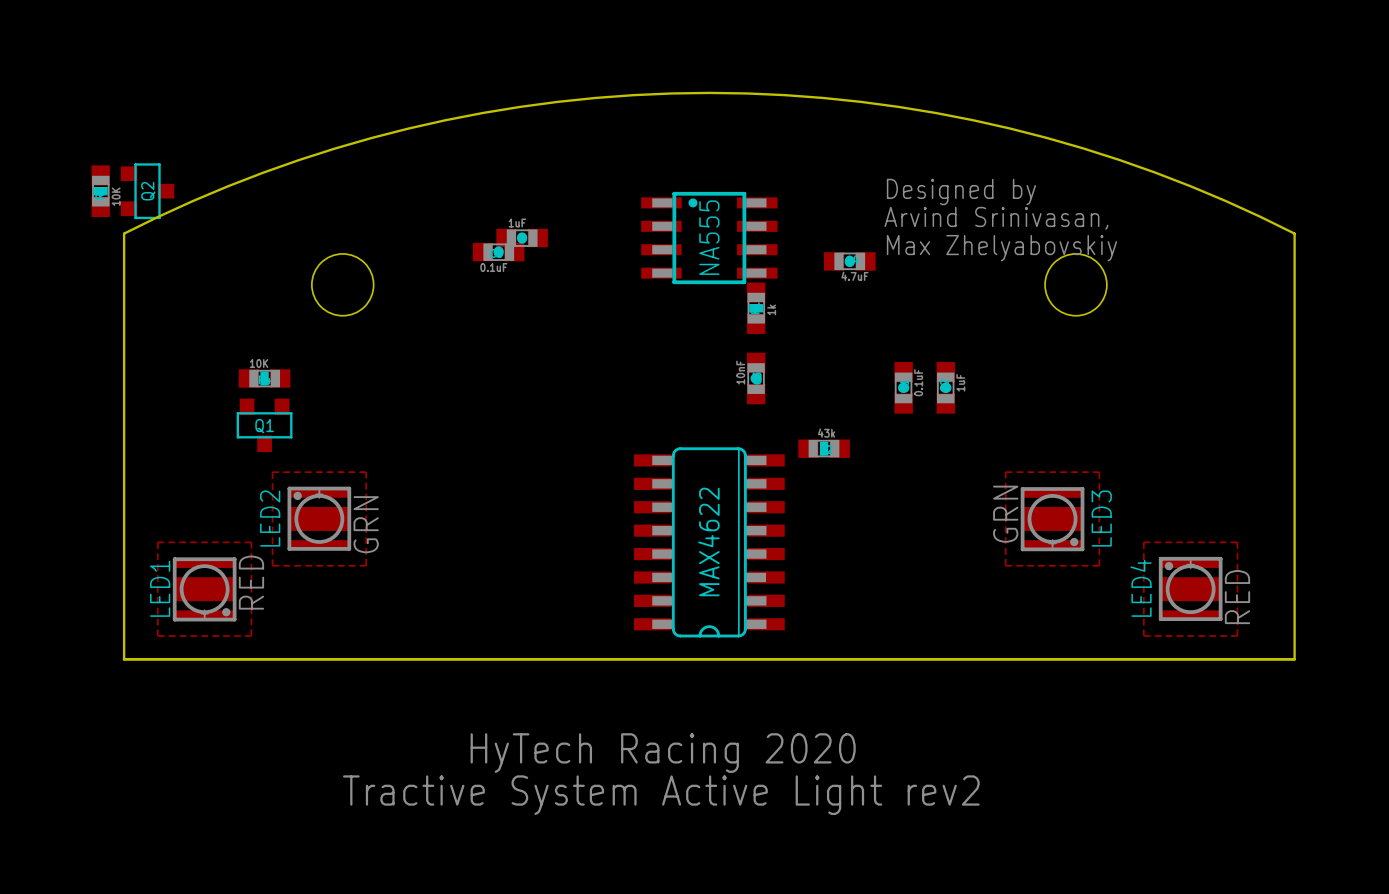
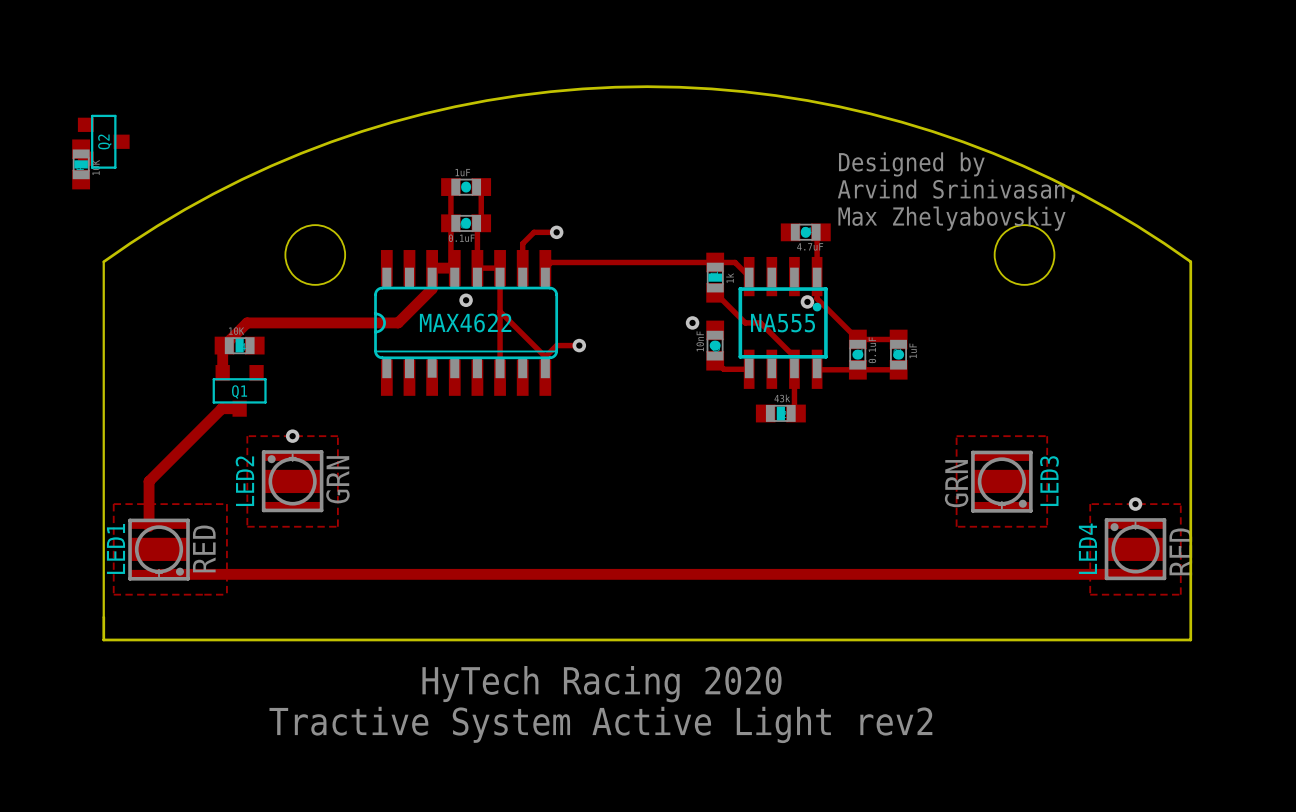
Q2 position: (147, 191) -> (103, 141)
track: none -> (450, 187) (450, 264) (454, 268) (432, 268) (432, 288) (398, 322) (247, 322) (222, 347) (222, 373)
track: none -> (481, 187) (481, 223) (477, 227) (477, 268) (500, 268) (500, 377)
part position: (522, 238) -> (466, 187)
NA555 rotation: 0° (709, 238) -> 90° clockwise (783, 322)
NA555 position: (709, 238) -> (783, 322)
track: none -> (556, 232) (534, 232) (522, 243) (522, 268)
via: none -> (556, 232)
track: none -> (820, 232) (817, 236) (817, 298) (857, 339) (898, 339)
board edge: (124, 291) (124, 233) (192, 201) (263, 172) (371, 138) (445, 120) (520, 106) (633, 95) (709, 92) (823, 97) (898, 106) (973, 120) (1047, 138) (1119, 160) (1190, 186) (1294, 233) (1294, 659) (124, 659) -> (103, 261) (185, 209) (242, 179) (301, 153) (361, 131) (423, 113) (518, 95) (615, 87) (679, 87) (743, 91) (839, 106) (901, 122) (963, 141) (1023, 165) (1081, 193) (1137, 225) (1190, 261) (1190, 639) (103, 639) (103, 617)
track: none -> (545, 268) (550, 262) (735, 262) (749, 276)
track: none -> (715, 292) (745, 322) (760, 322) (794, 356) (794, 411) (796, 413)
via: none -> (466, 300)
via: none -> (807, 301)
track: none -> (500, 311) (545, 356)
via: none -> (692, 322)
track: none -> (579, 345) (556, 345) (545, 356)
via: none -> (579, 345)
track: none -> (715, 360) (723, 369) (749, 369)
track: none -> (817, 369) (898, 369)
track: none -> (239, 408) (221, 408) (149, 481) (149, 526)
via: none -> (292, 436)
zone outline: (157, 542) (157, 636) -> (136, 504) (113, 504) (113, 594) (136, 594)
MAX4622 rotation: 0° (709, 542) -> 90° clockwise (466, 322)
MAX4622 position: (709, 542) -> (466, 322)
via: none -> (1135, 504)
LED1 position: (204, 589) -> (159, 549)
track: none -> (159, 574) (1135, 574)
text position: HyTech Racing 2020 (663, 753) -> HyTech Racing 2020 (602, 684)
text position: Tractive System Active Light rev2 (661, 795) -> Tractive System Active Light rev2 (600, 724)

